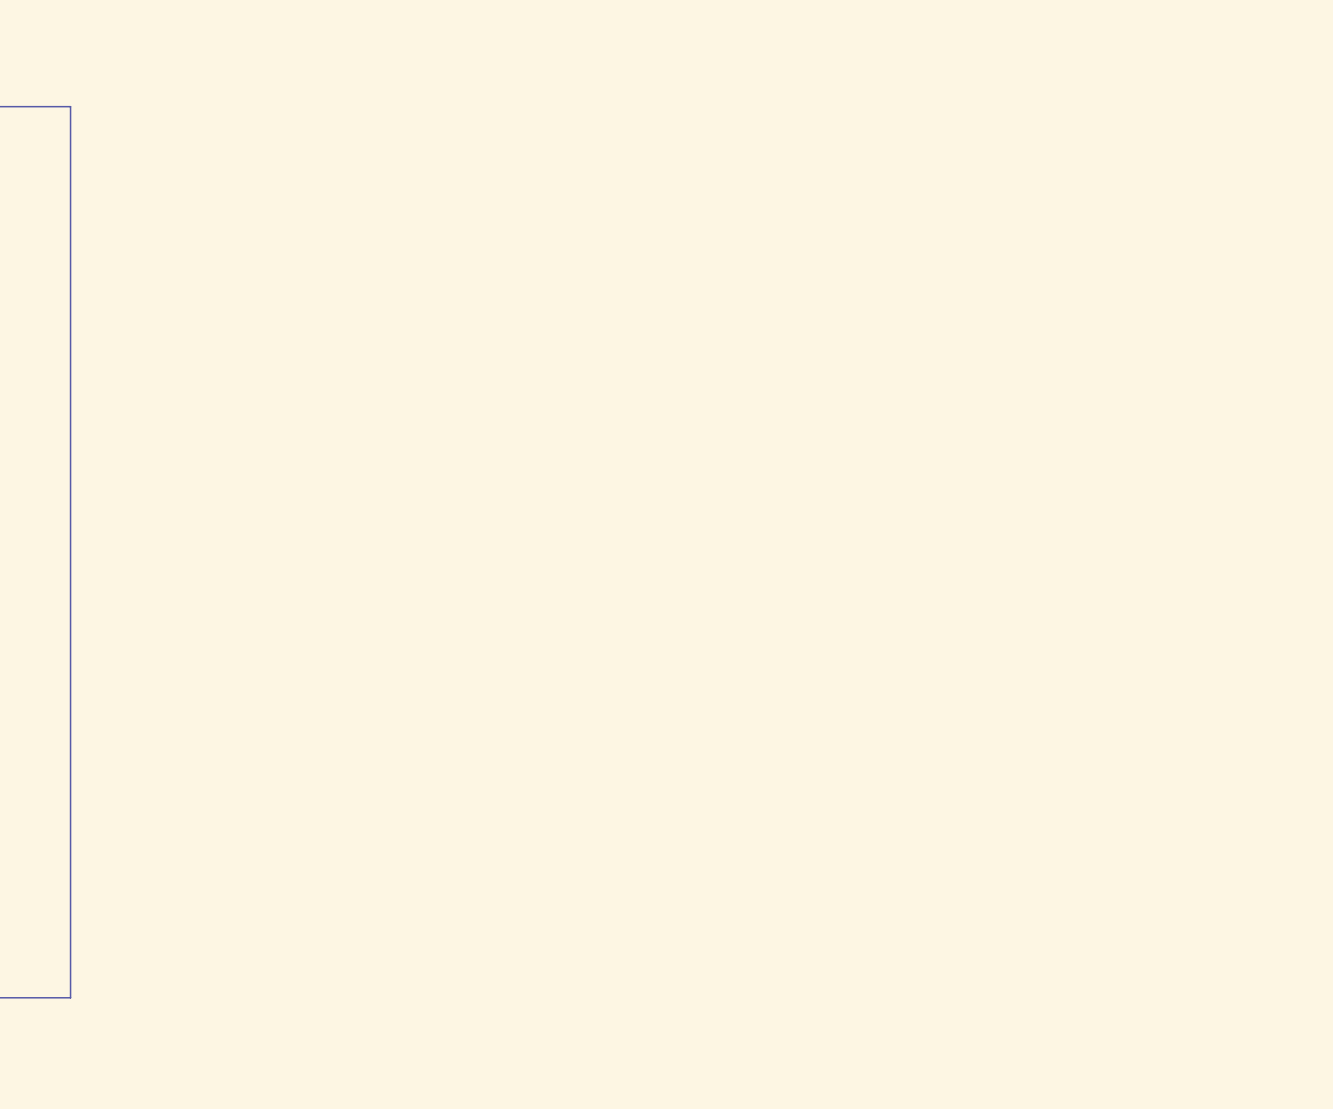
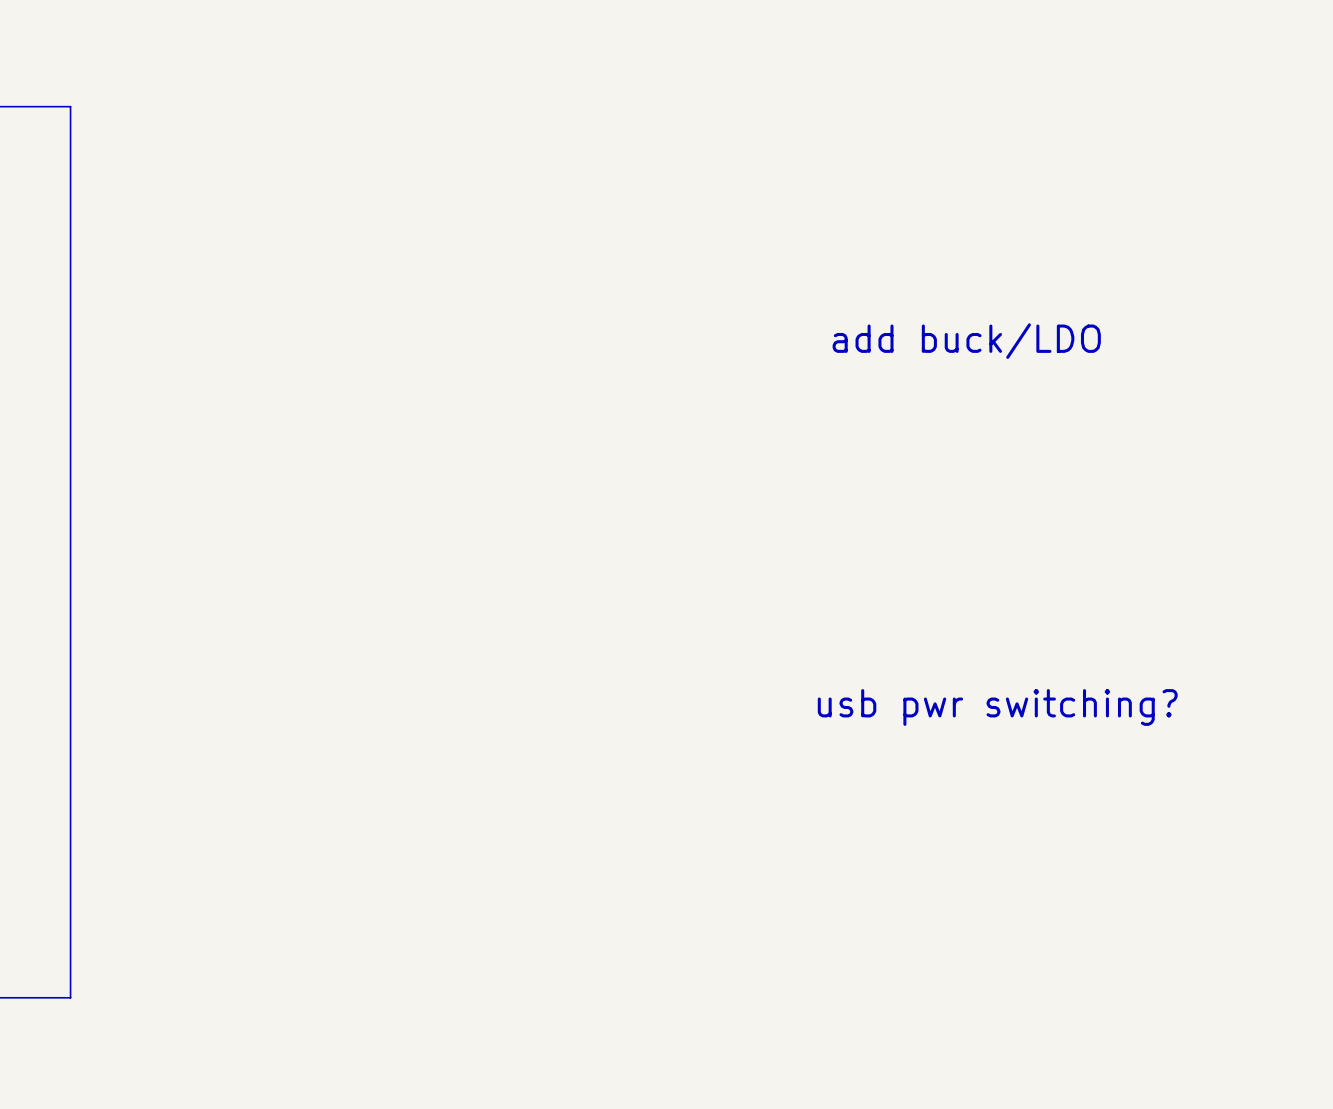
text: none -> add buck/LDO (966, 341)
text: none -> usb pwr switching? (997, 707)

